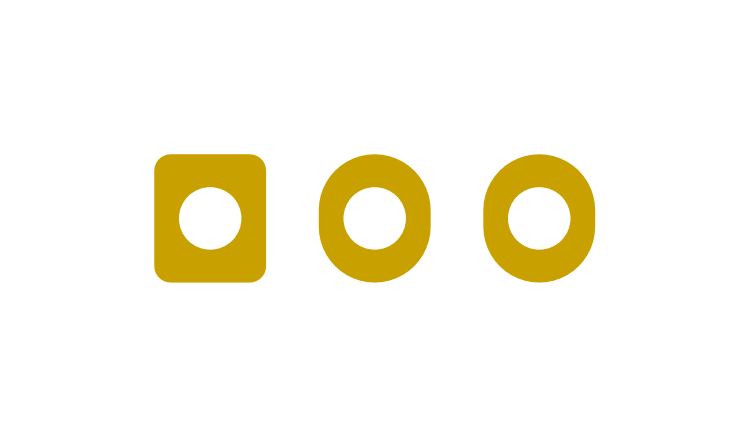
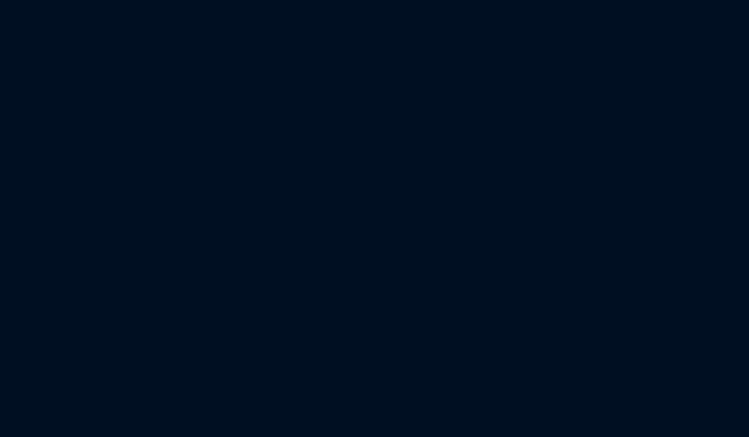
part: (374, 218) -> none

